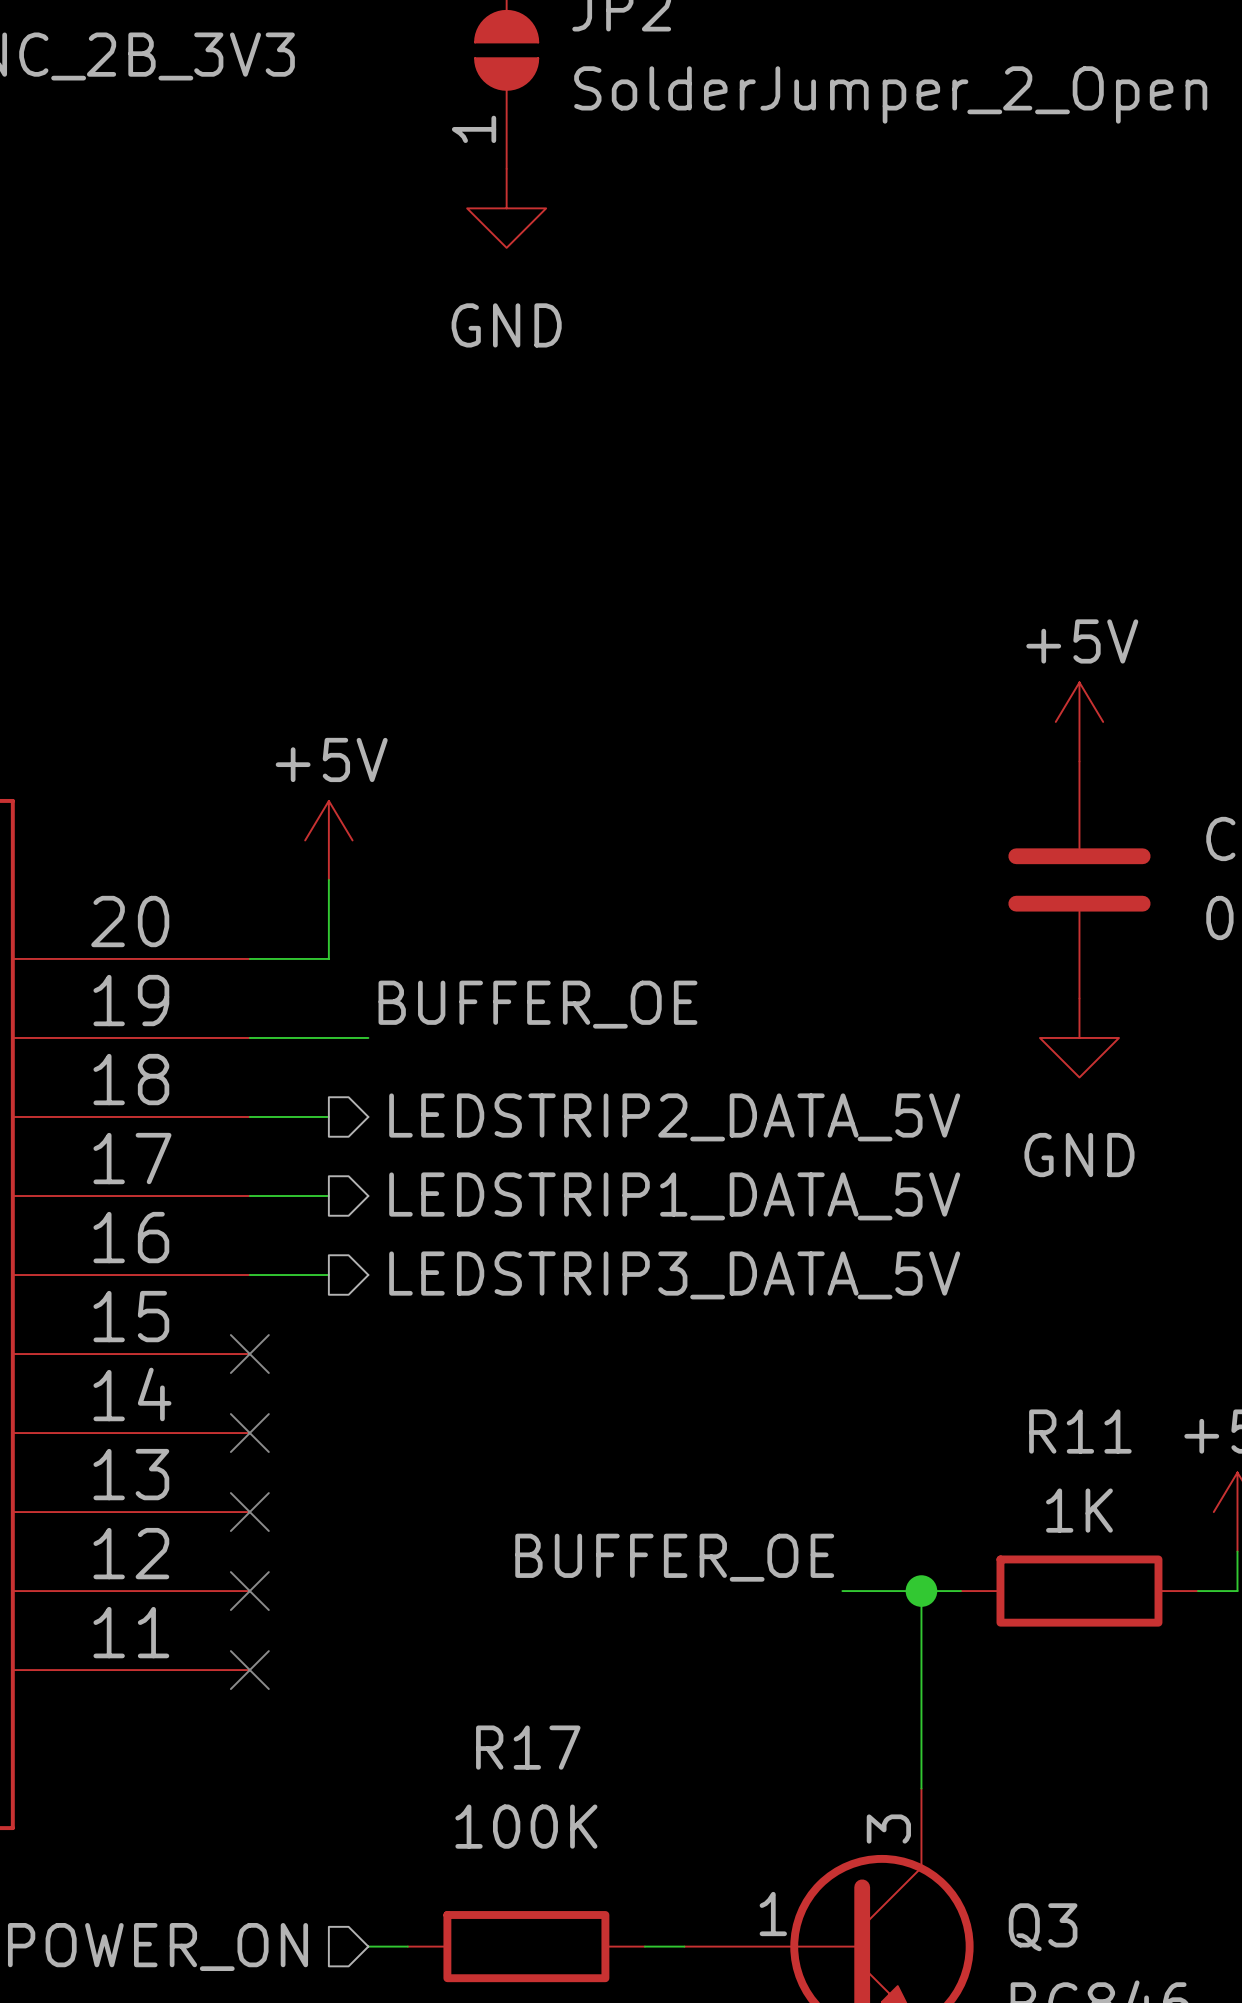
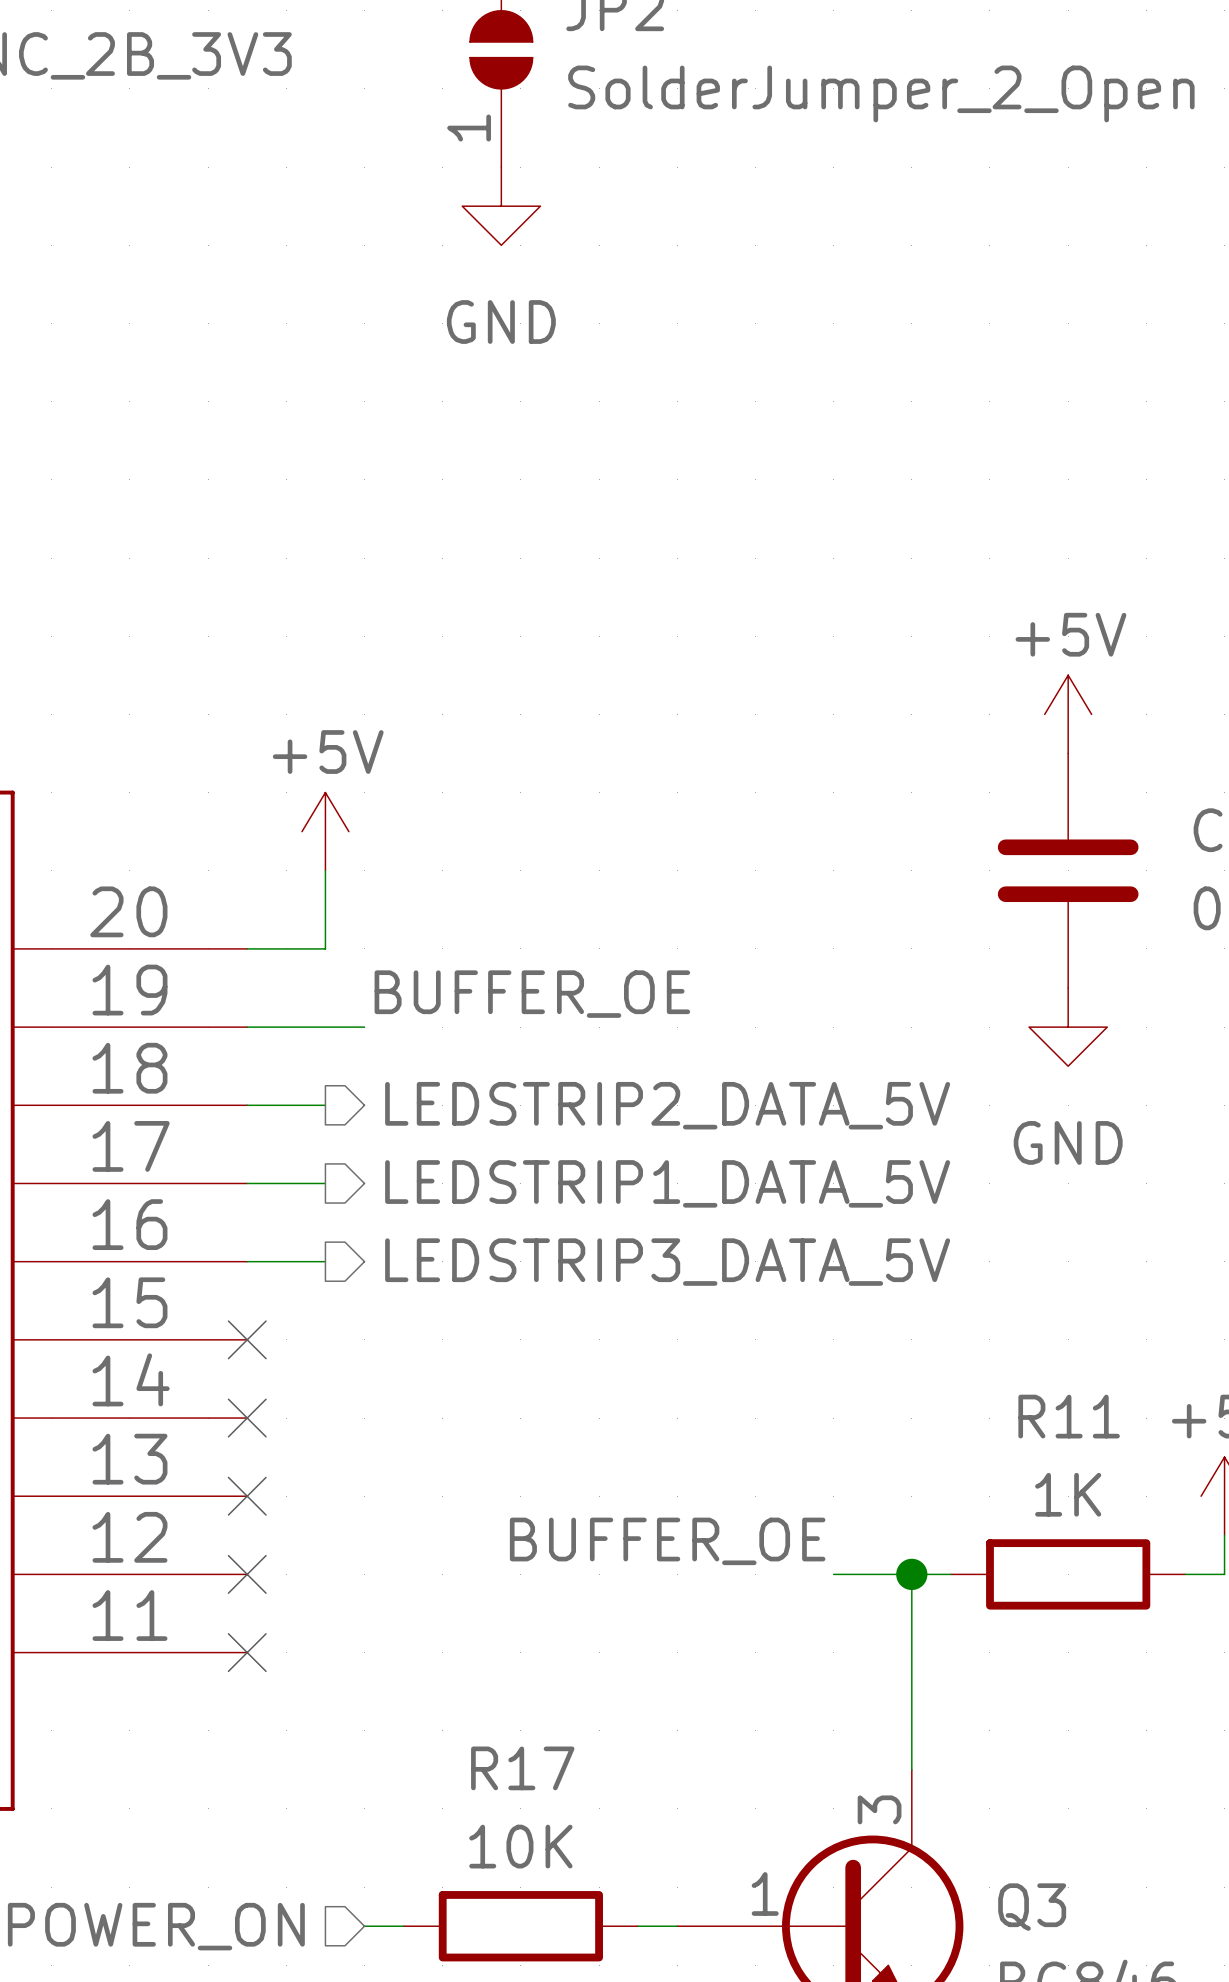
R17 name position: R17 (528, 1747) -> R17 (522, 1768)
R17 value: 100K (526, 1826) -> 10K (520, 1846)

